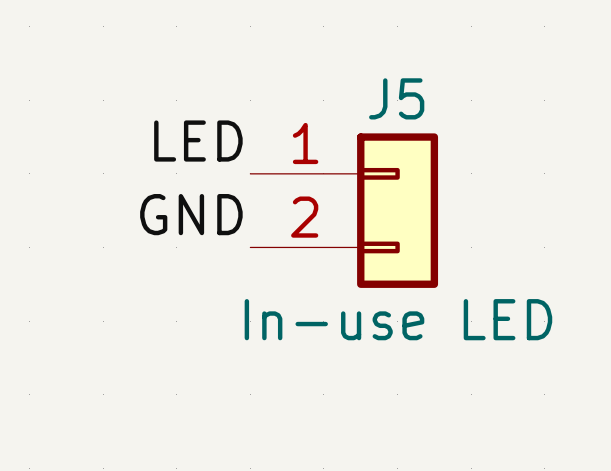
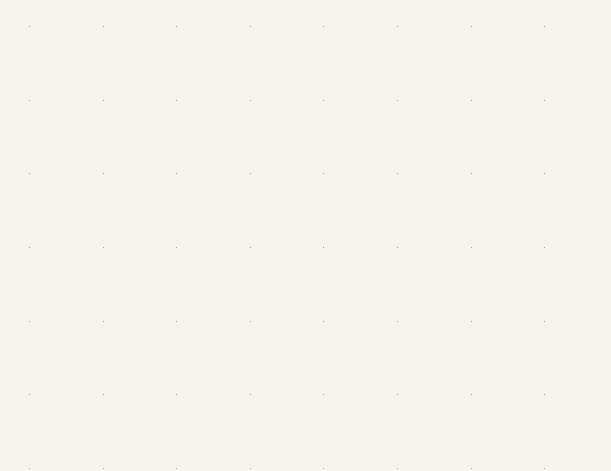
label: LED (198, 141) -> none
J5: In-use LED (344, 210) -> none
label: GND (191, 214) -> none

